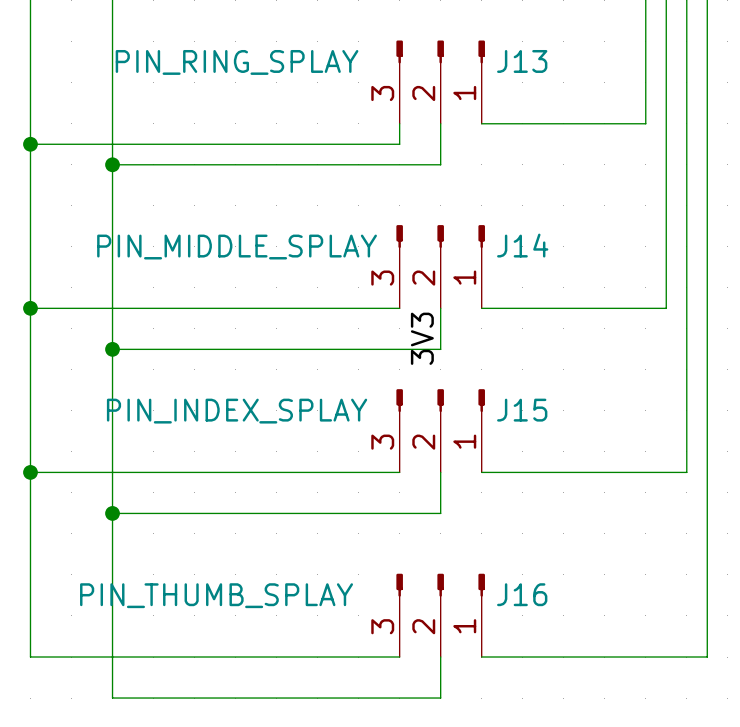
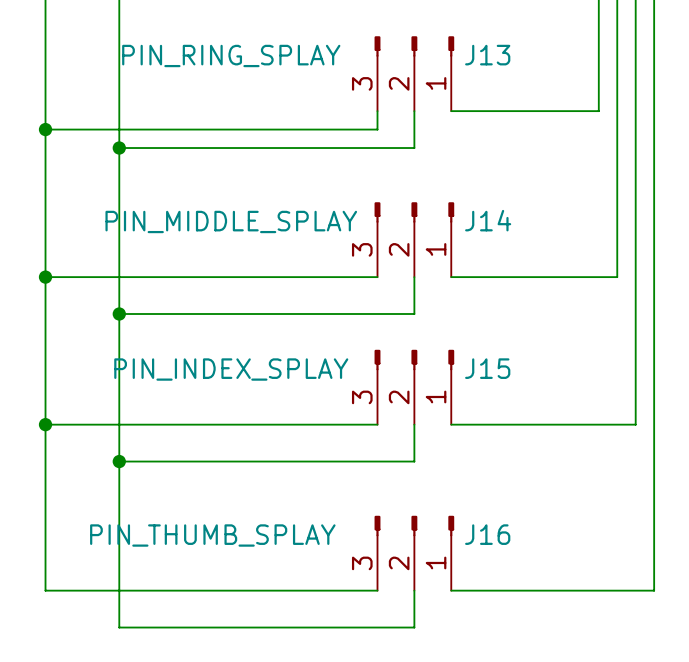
label: 3V3 (422, 338) -> none

